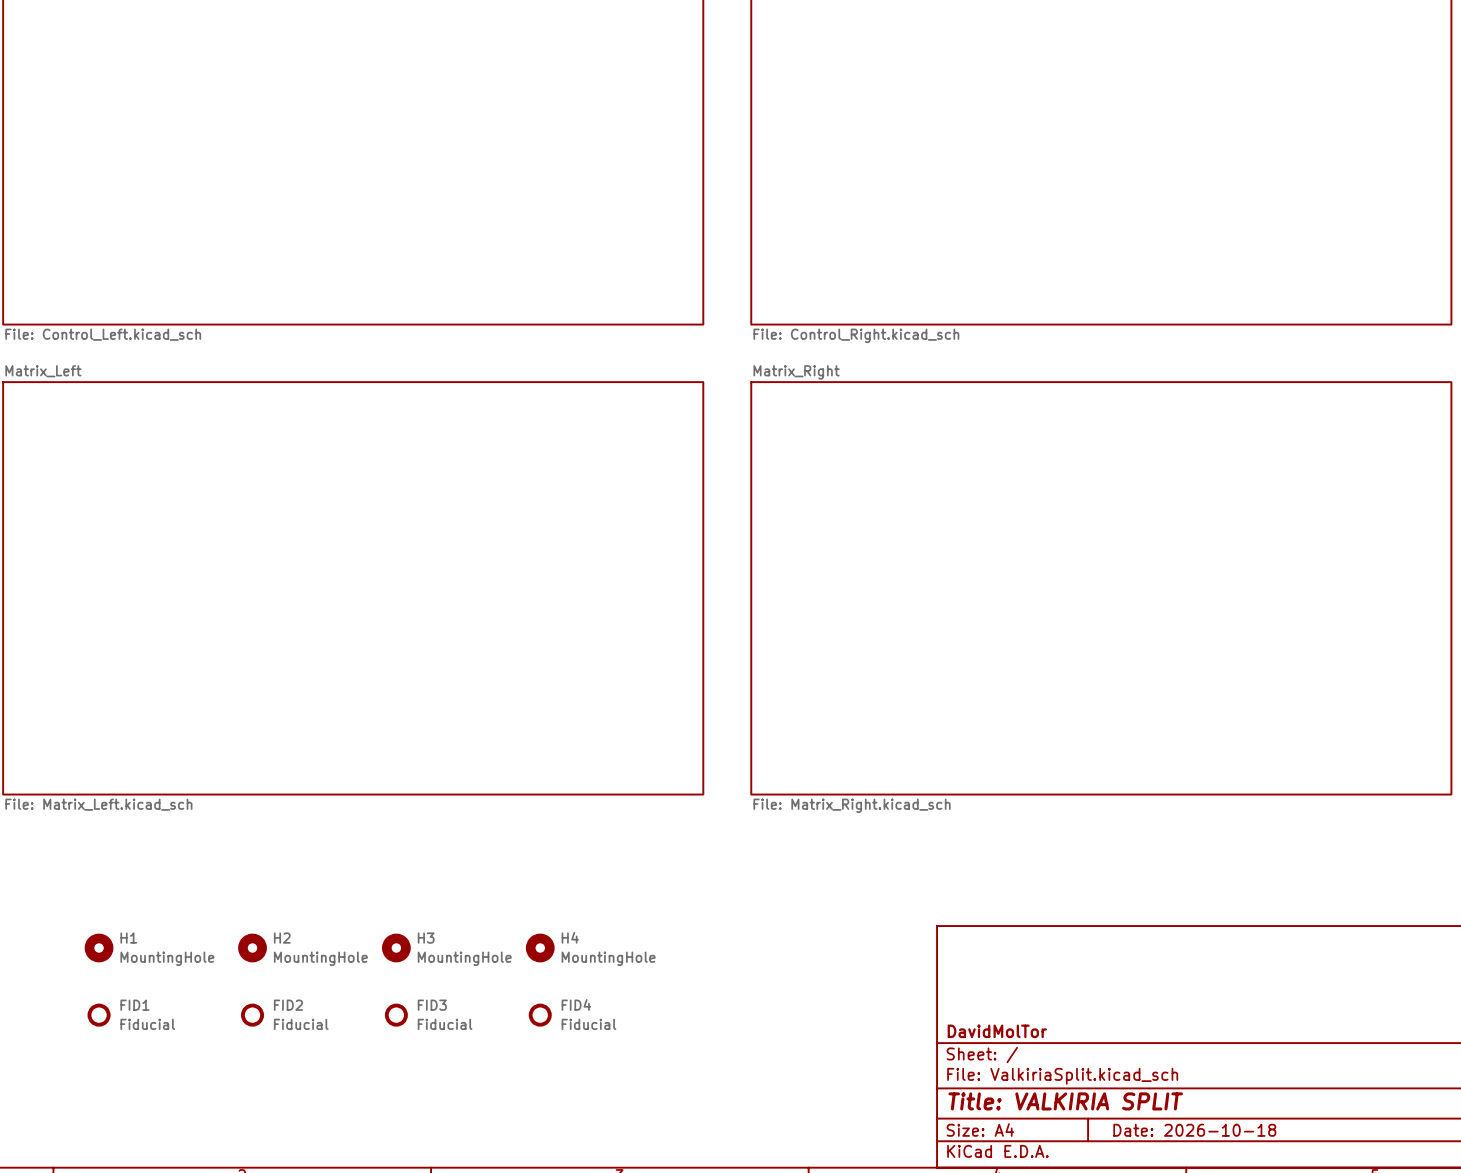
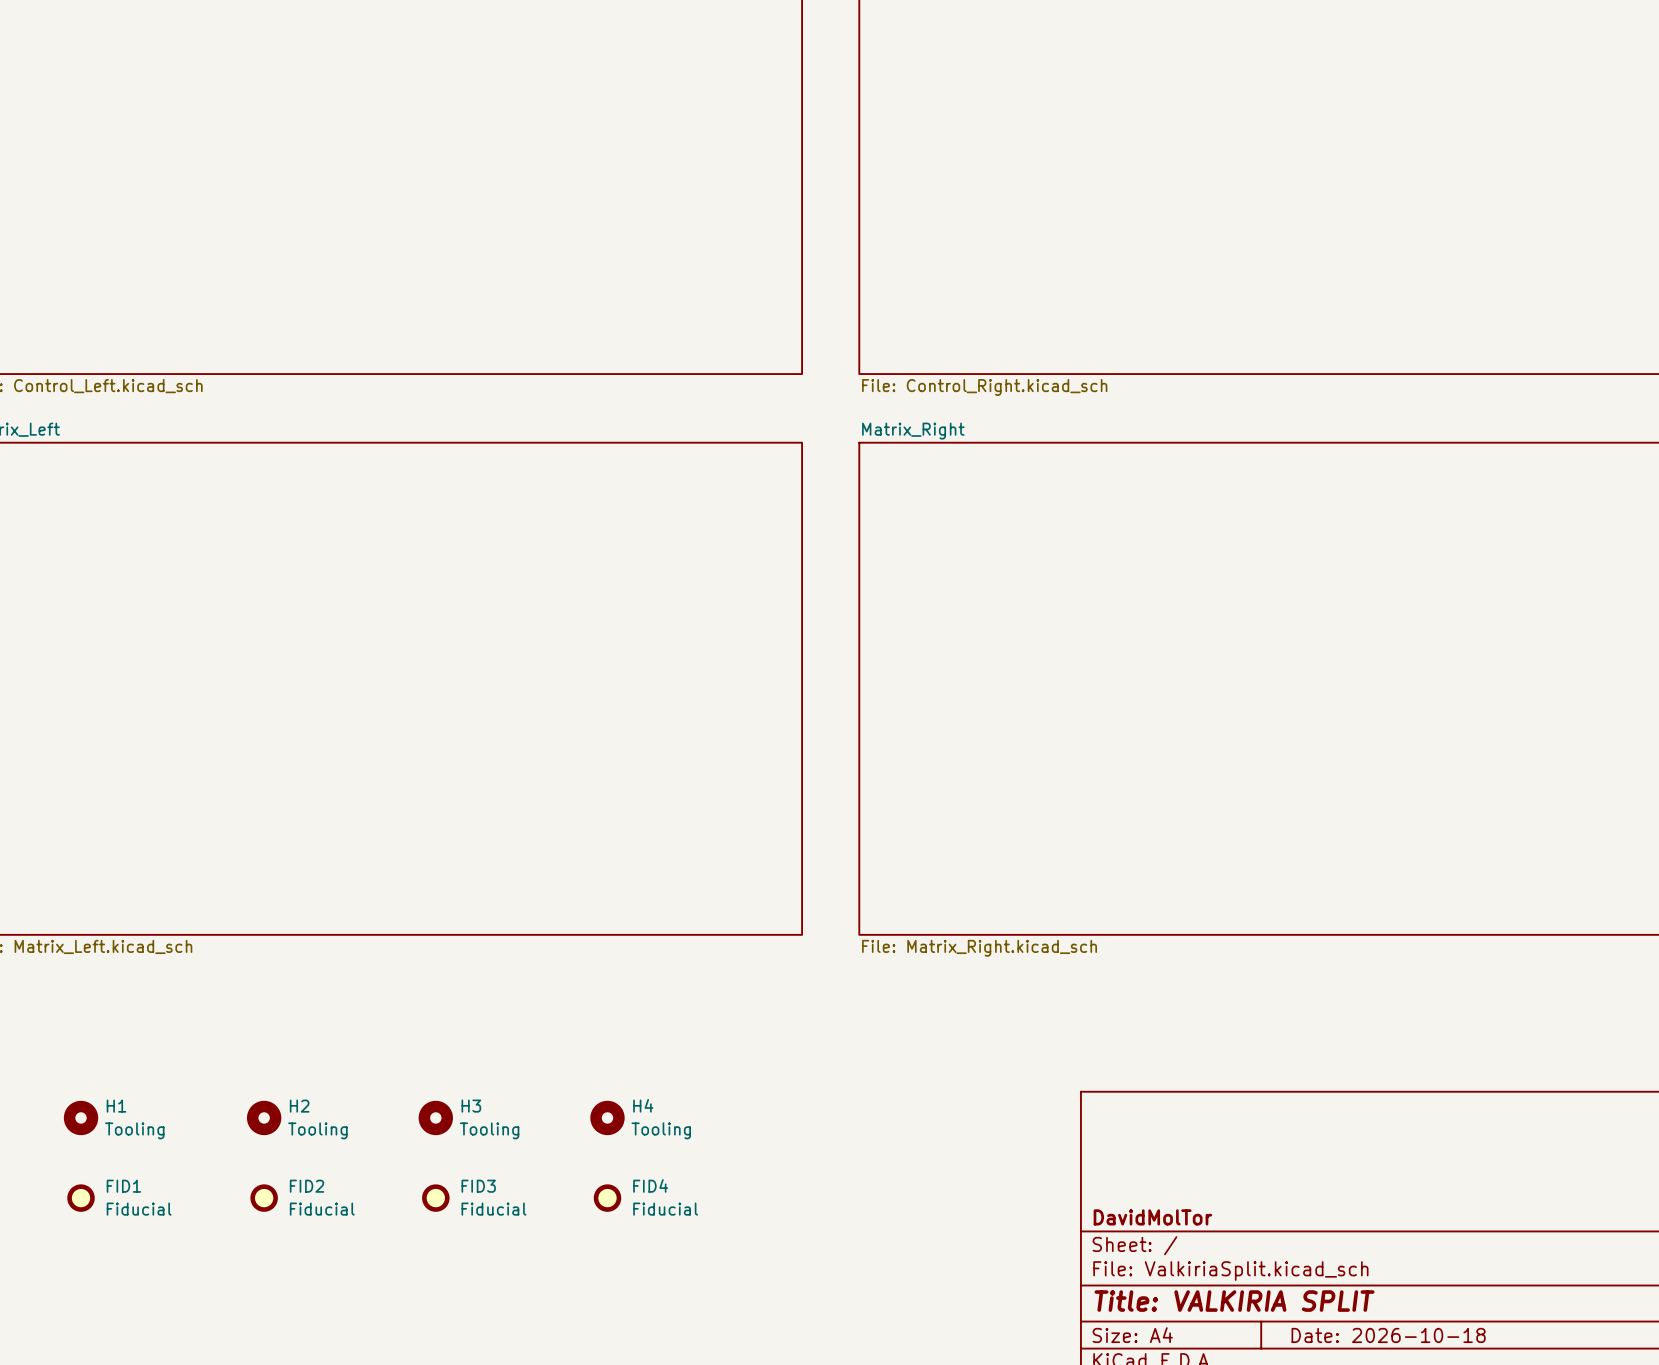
H1 value: MountingHole (167, 958) -> Tooling (134, 1130)
H2 value: MountingHole (320, 958) -> Tooling (317, 1130)
H3 value: MountingHole (464, 958) -> Tooling (489, 1130)
H4 value: MountingHole (608, 958) -> Tooling (661, 1130)

